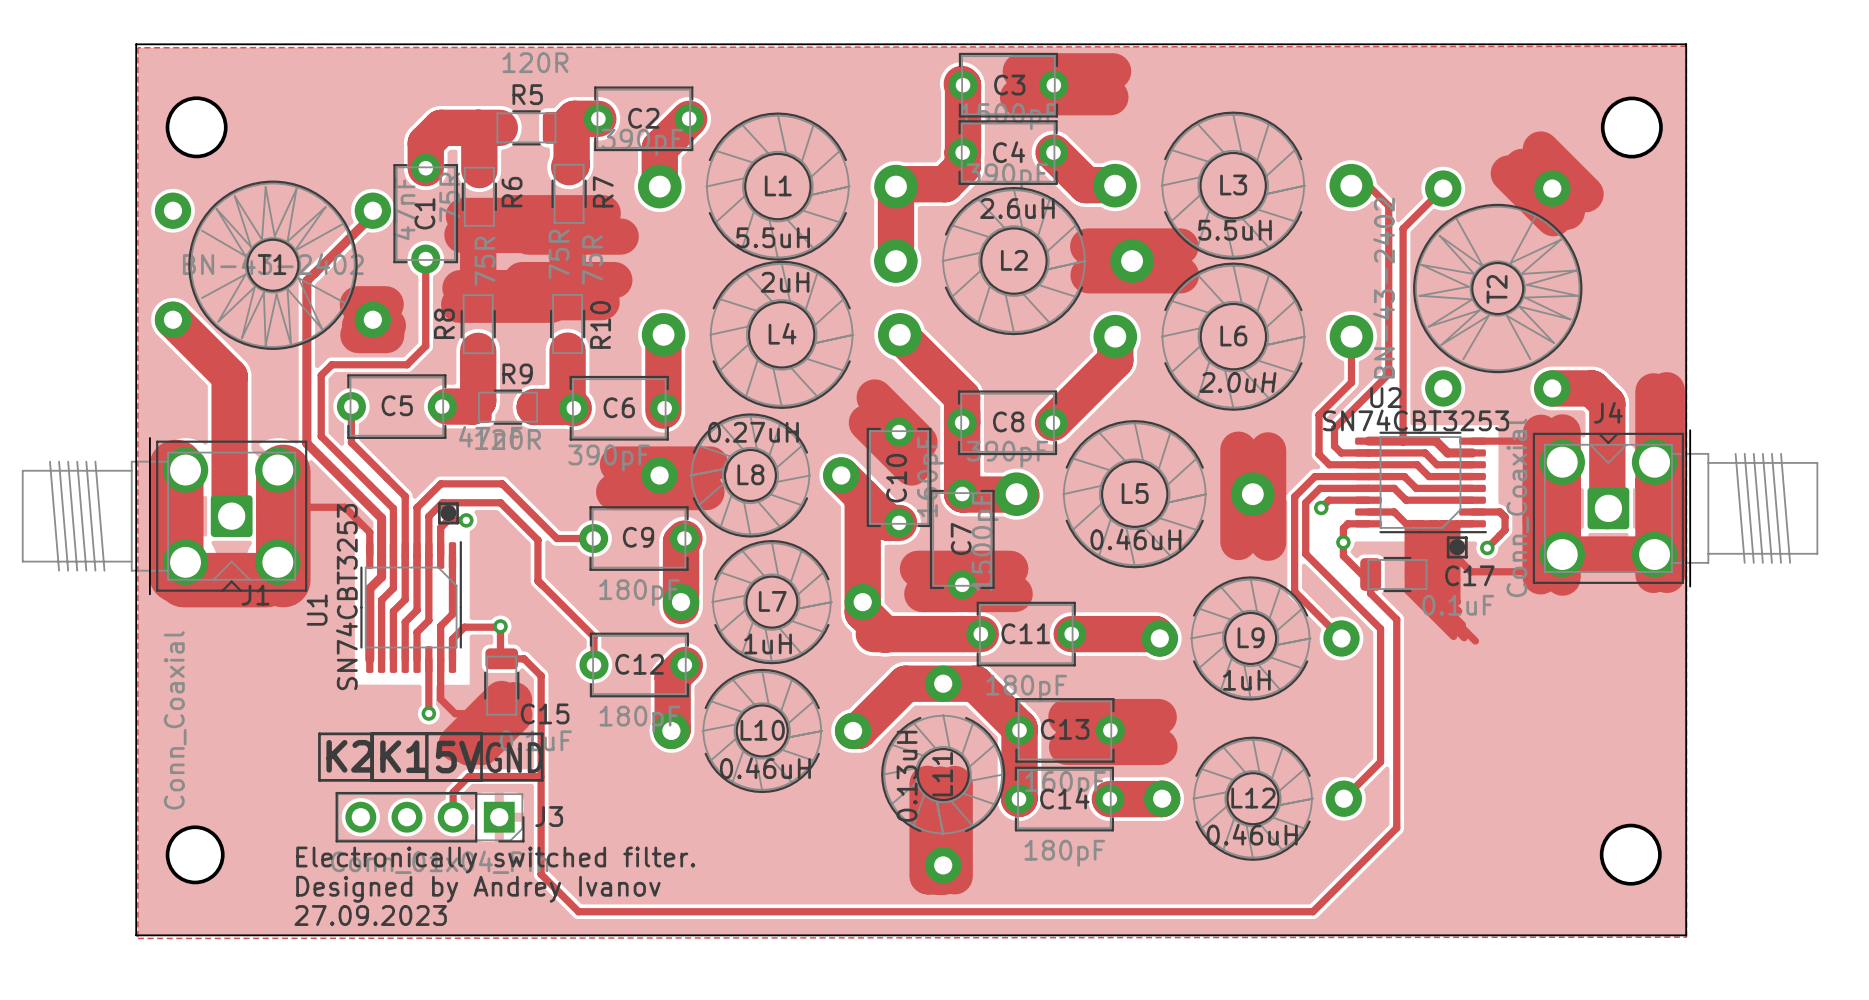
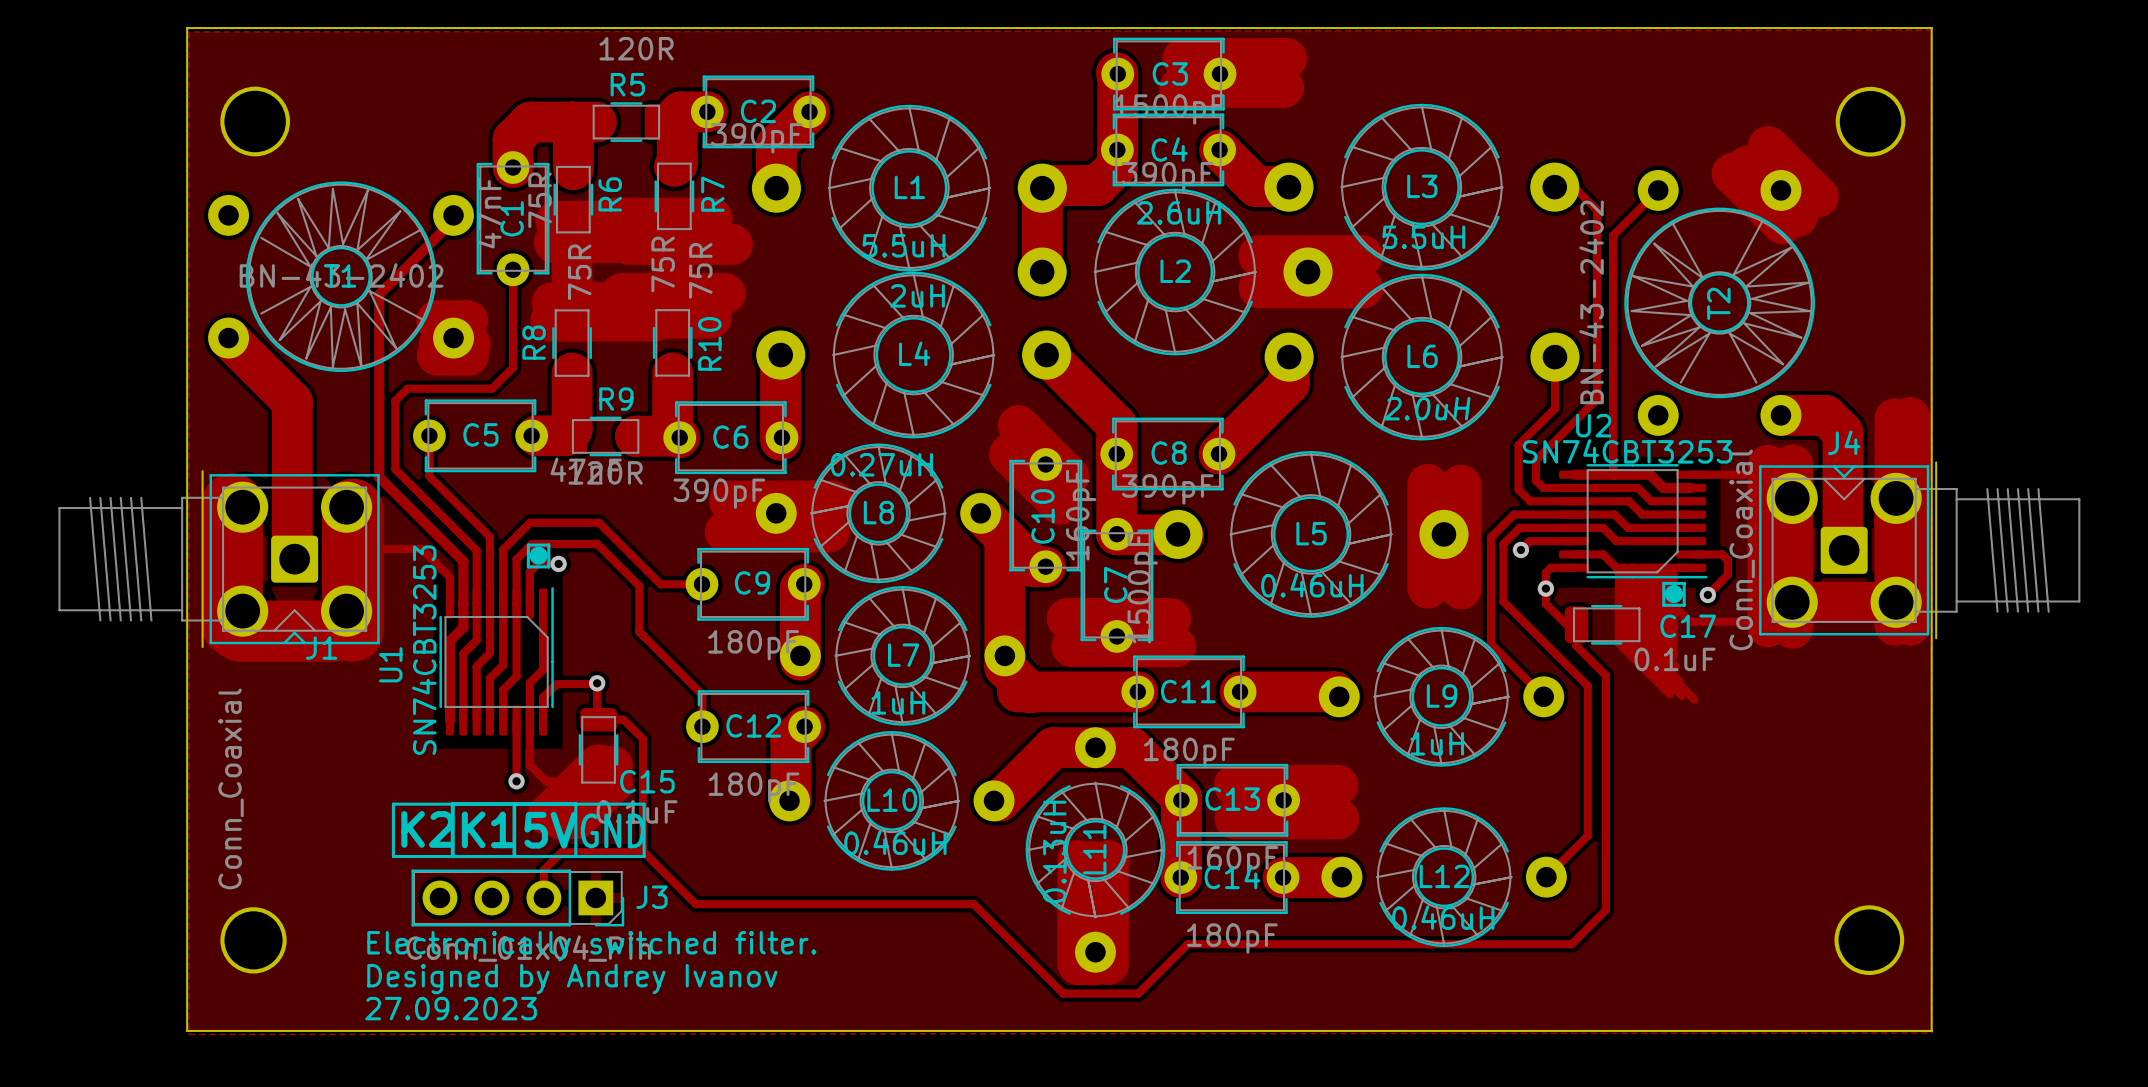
track: (541, 777) (541, 874) (578, 911) (1312, 911) (1366, 858) -> (642, 851) (695, 904) (973, 904) (1063, 993) (1138, 993) (1187, 944) (1571, 944)

